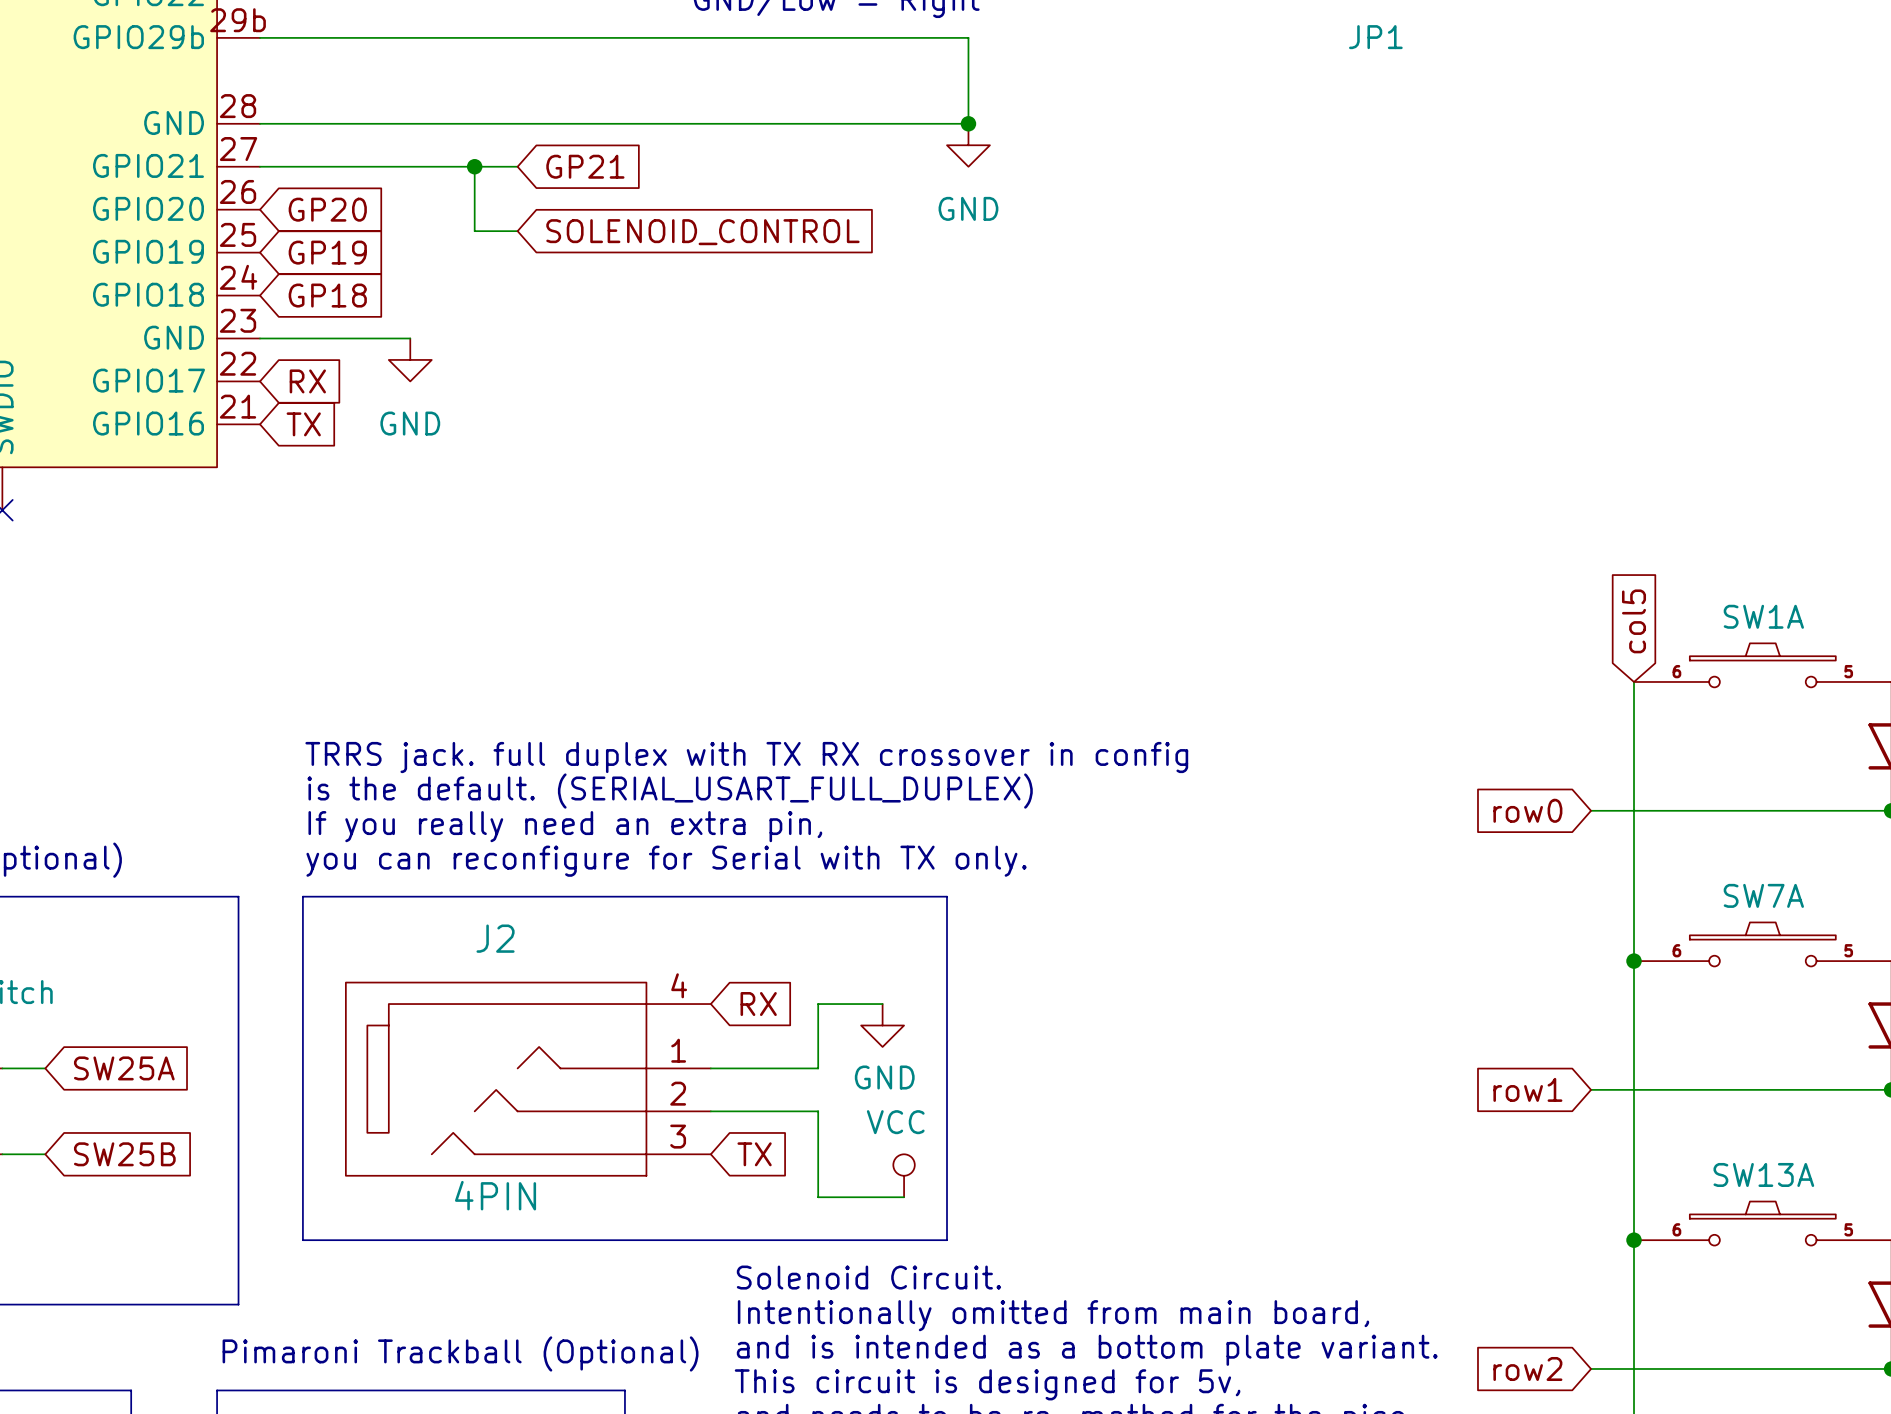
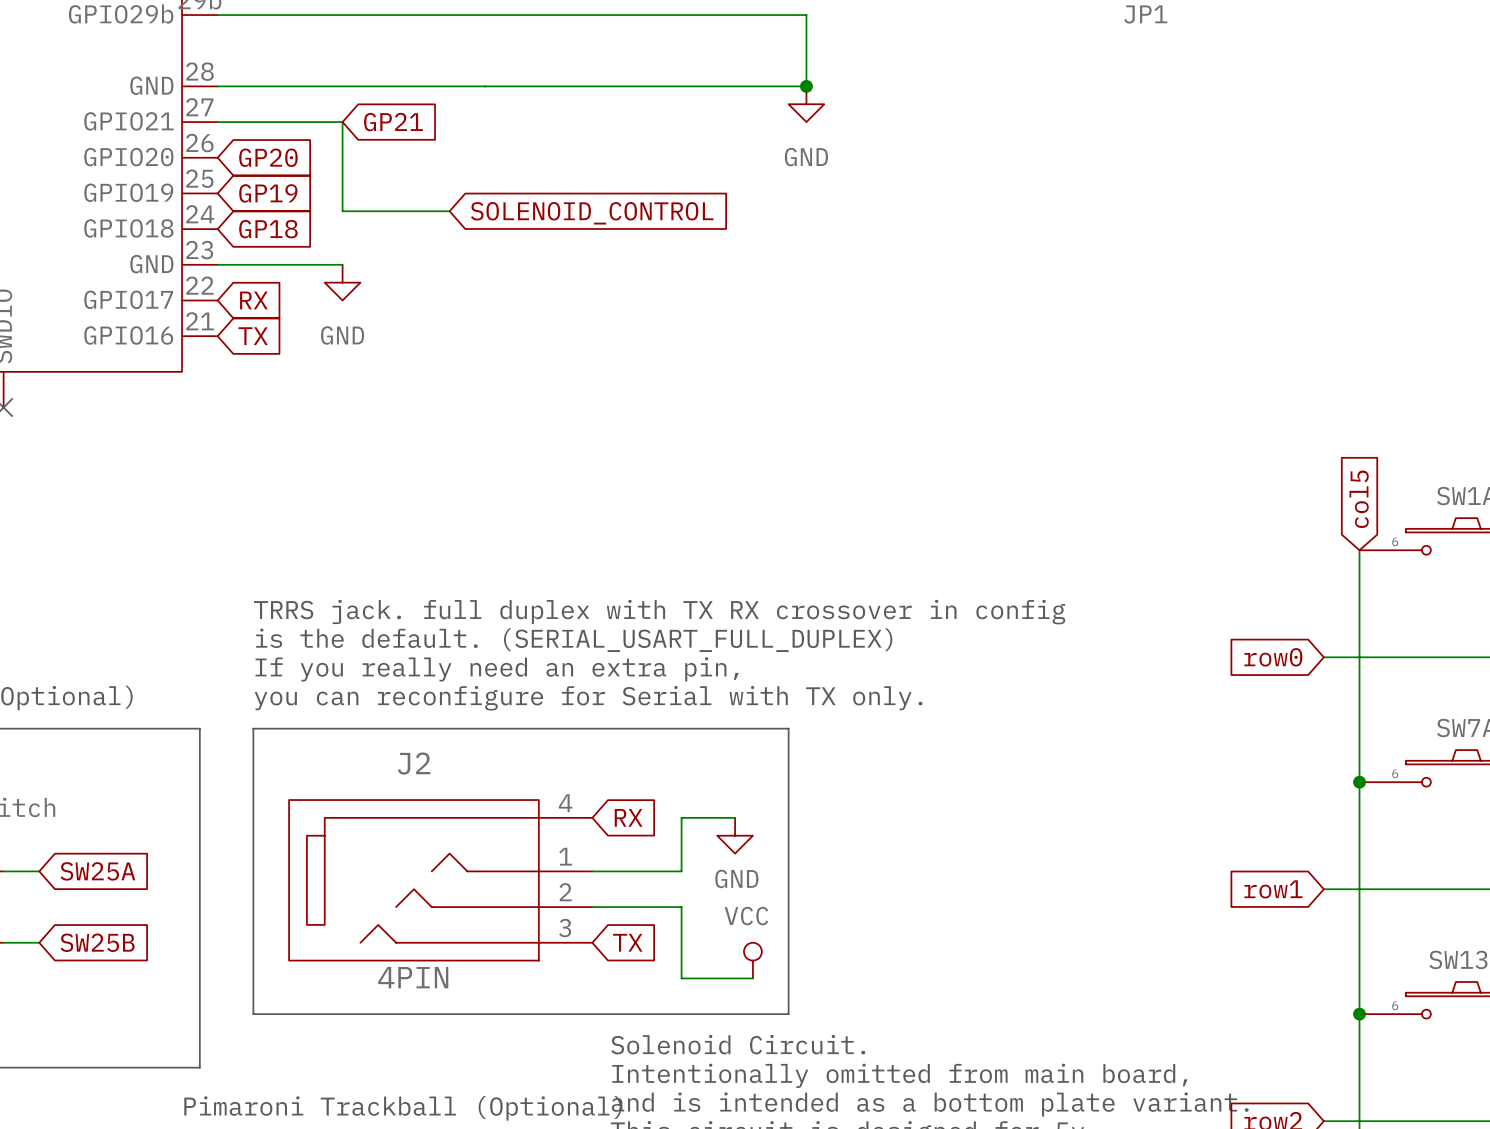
wire: (410, 166) (517, 166) -> (342, 122) (342, 211) (449, 211)
wire: (474, 166) (474, 231) (517, 231) -> none
junction: (474, 166) -> none
global label position: GP21 (585, 166) -> GP21 (393, 122)
global label position: SOLENOID_CONTROL (702, 232) -> SOLENOID_CONTROL (592, 213)

